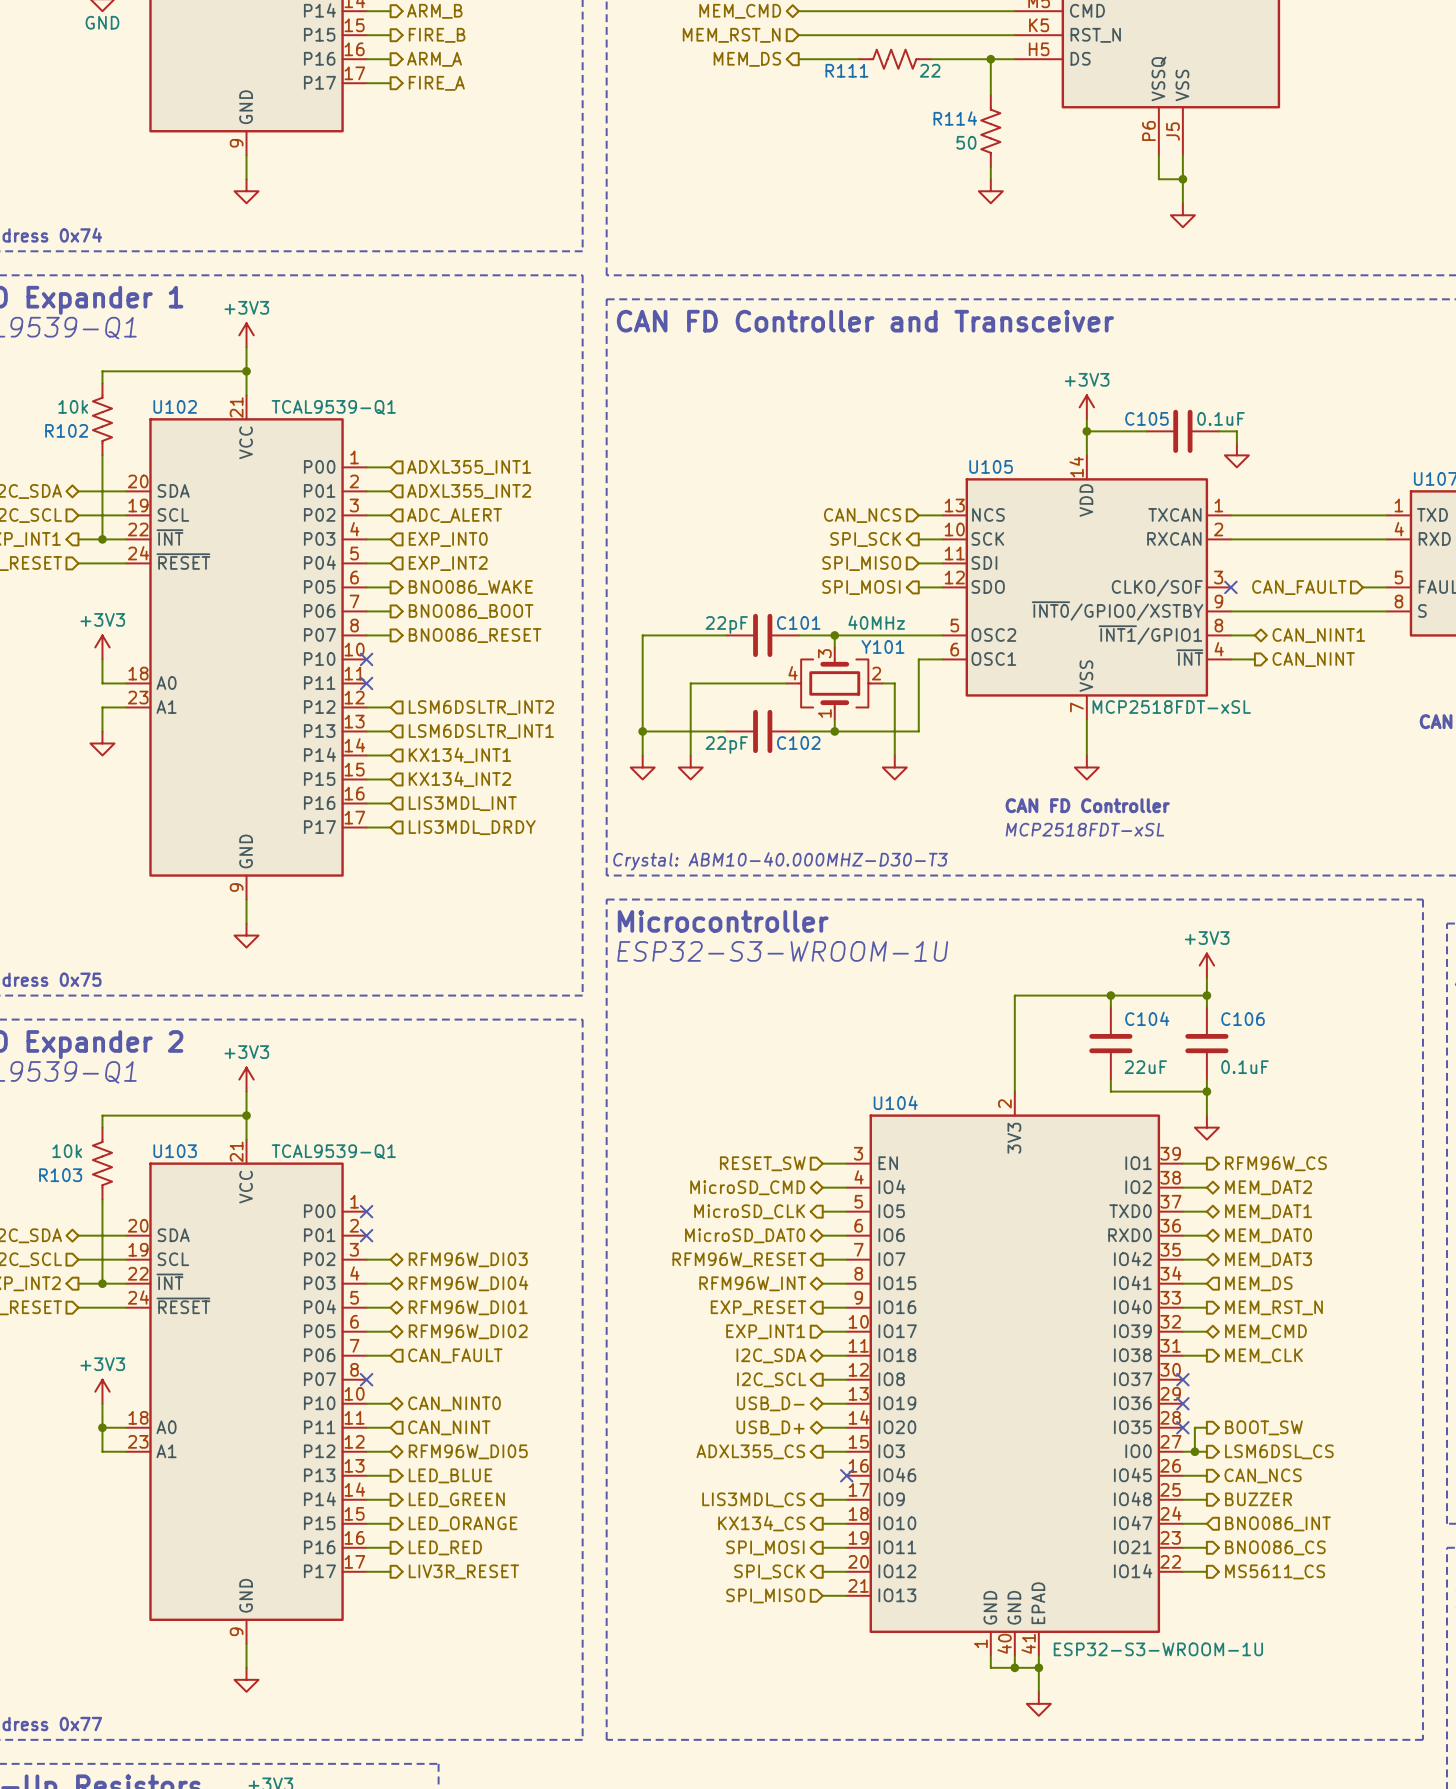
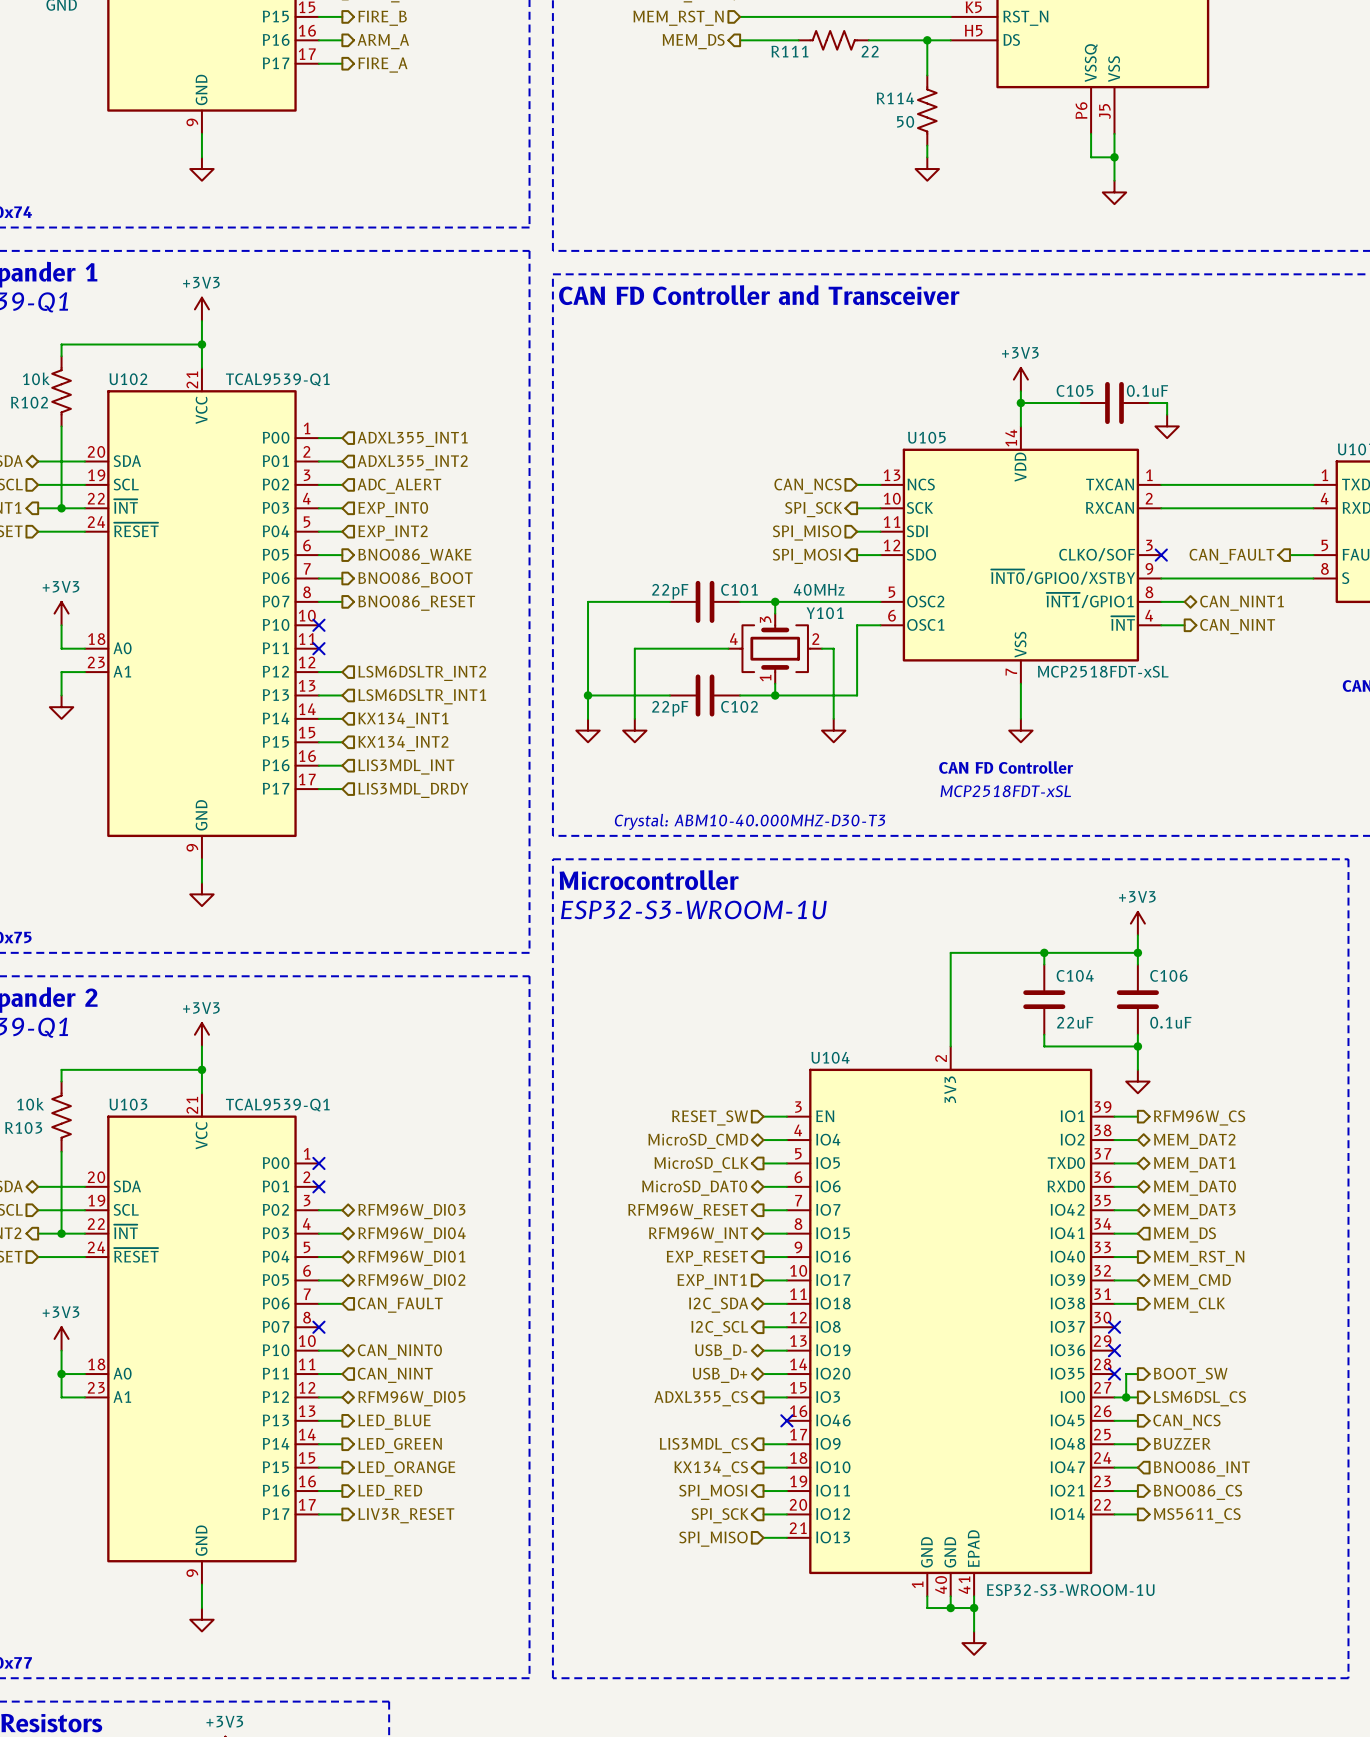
hierarchical label shape: input (1299, 587) -> output (1232, 556)

